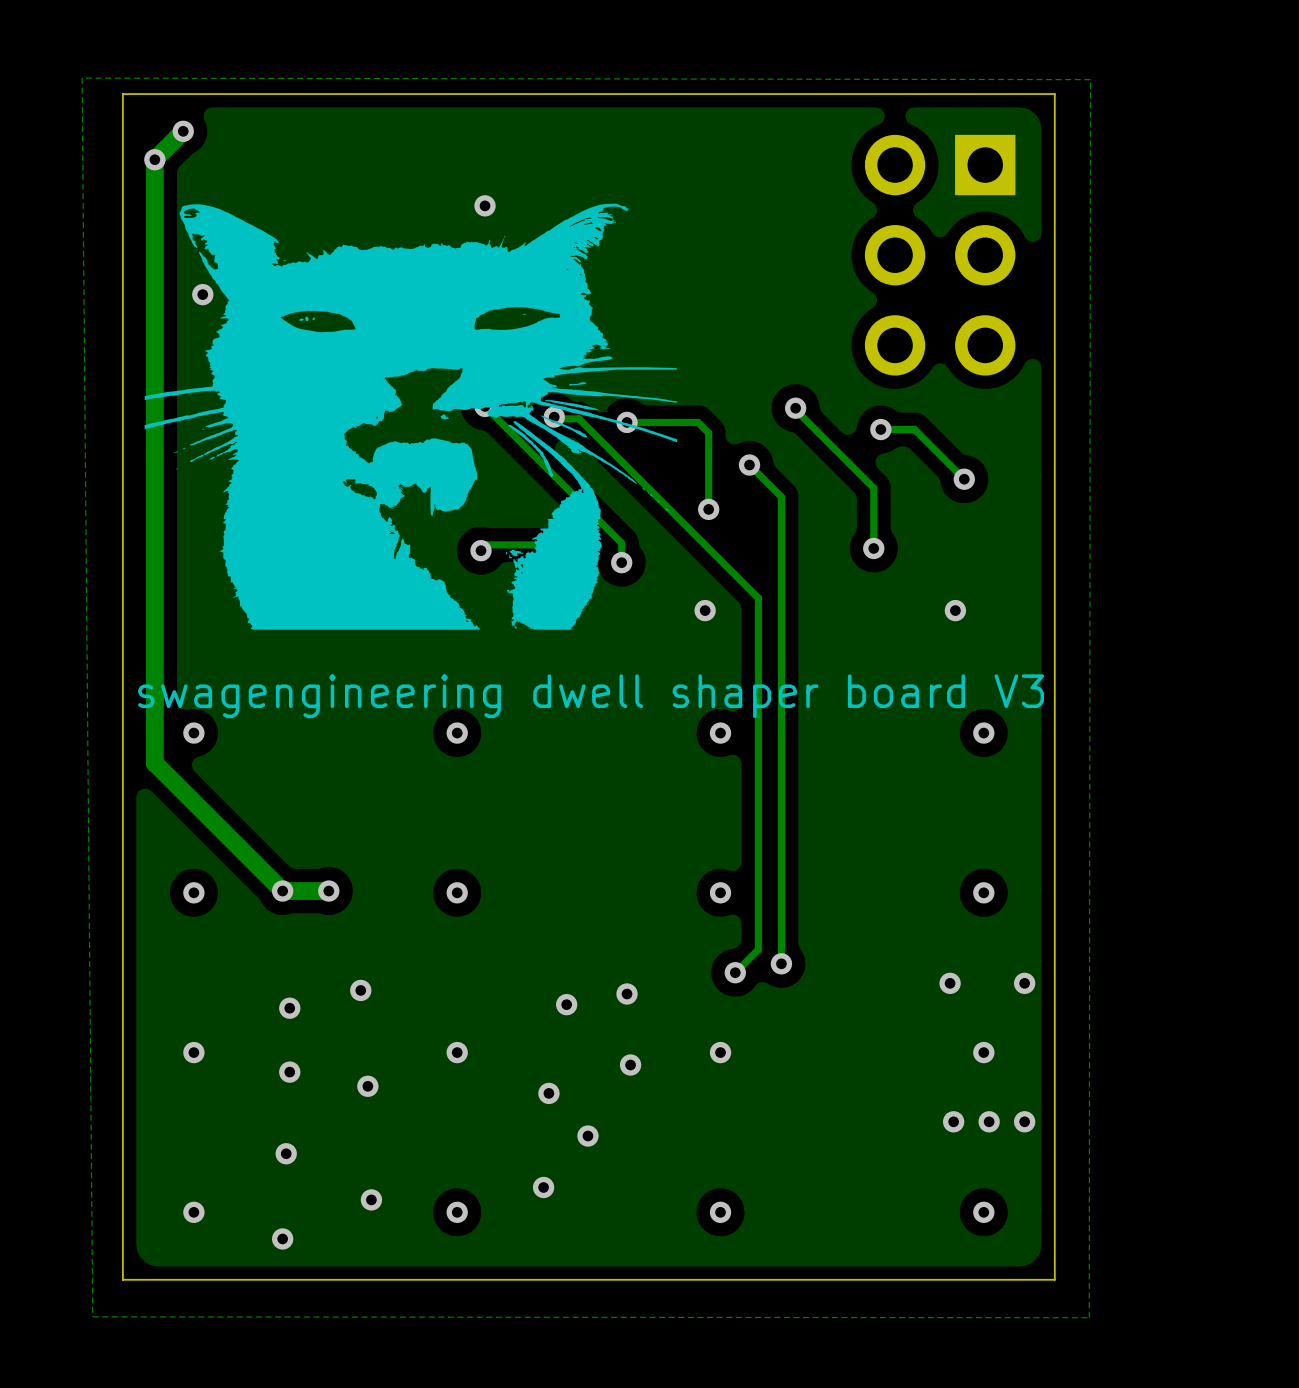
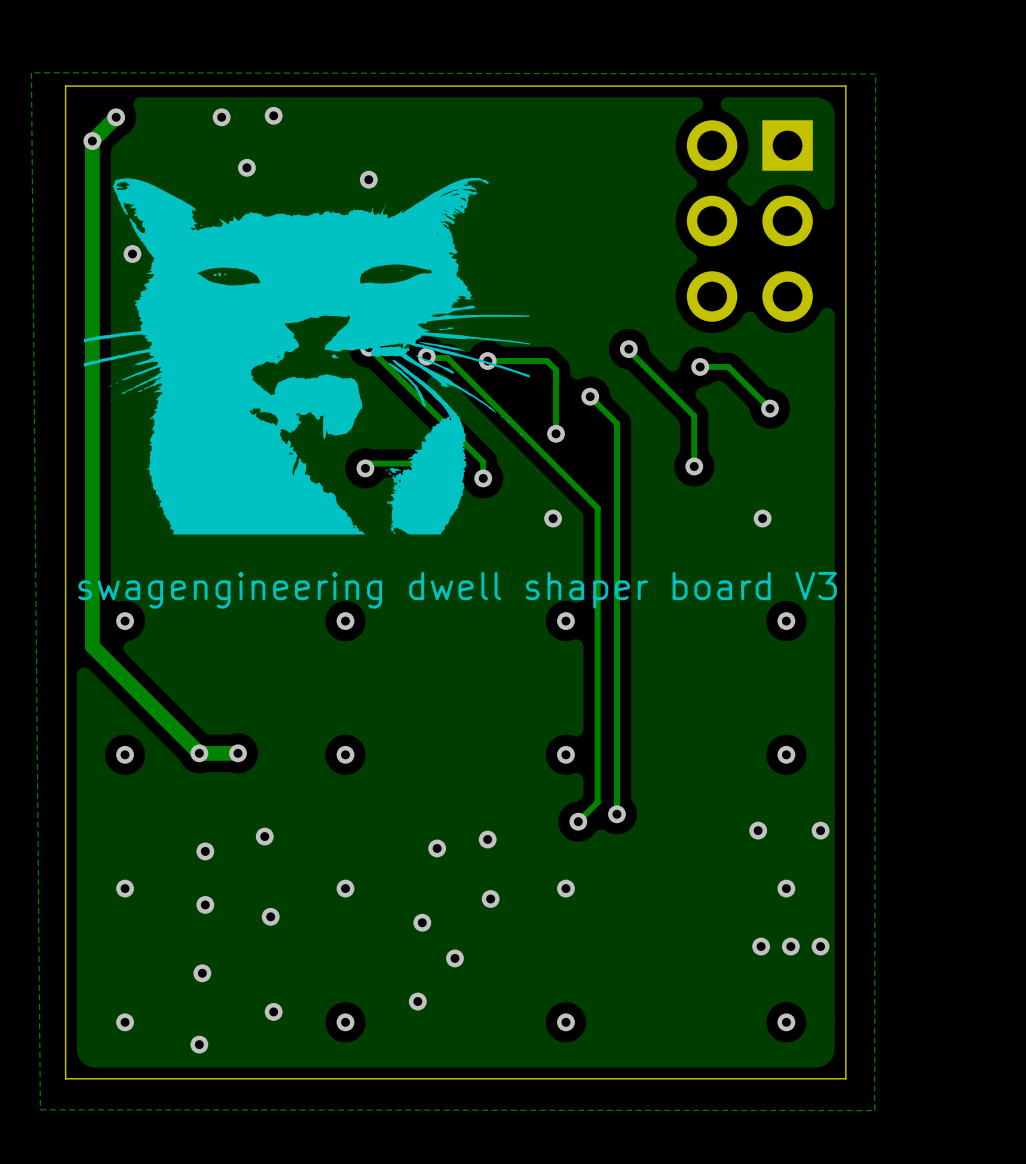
via: none -> (273, 115)
via: none -> (221, 117)
via: none -> (246, 167)

